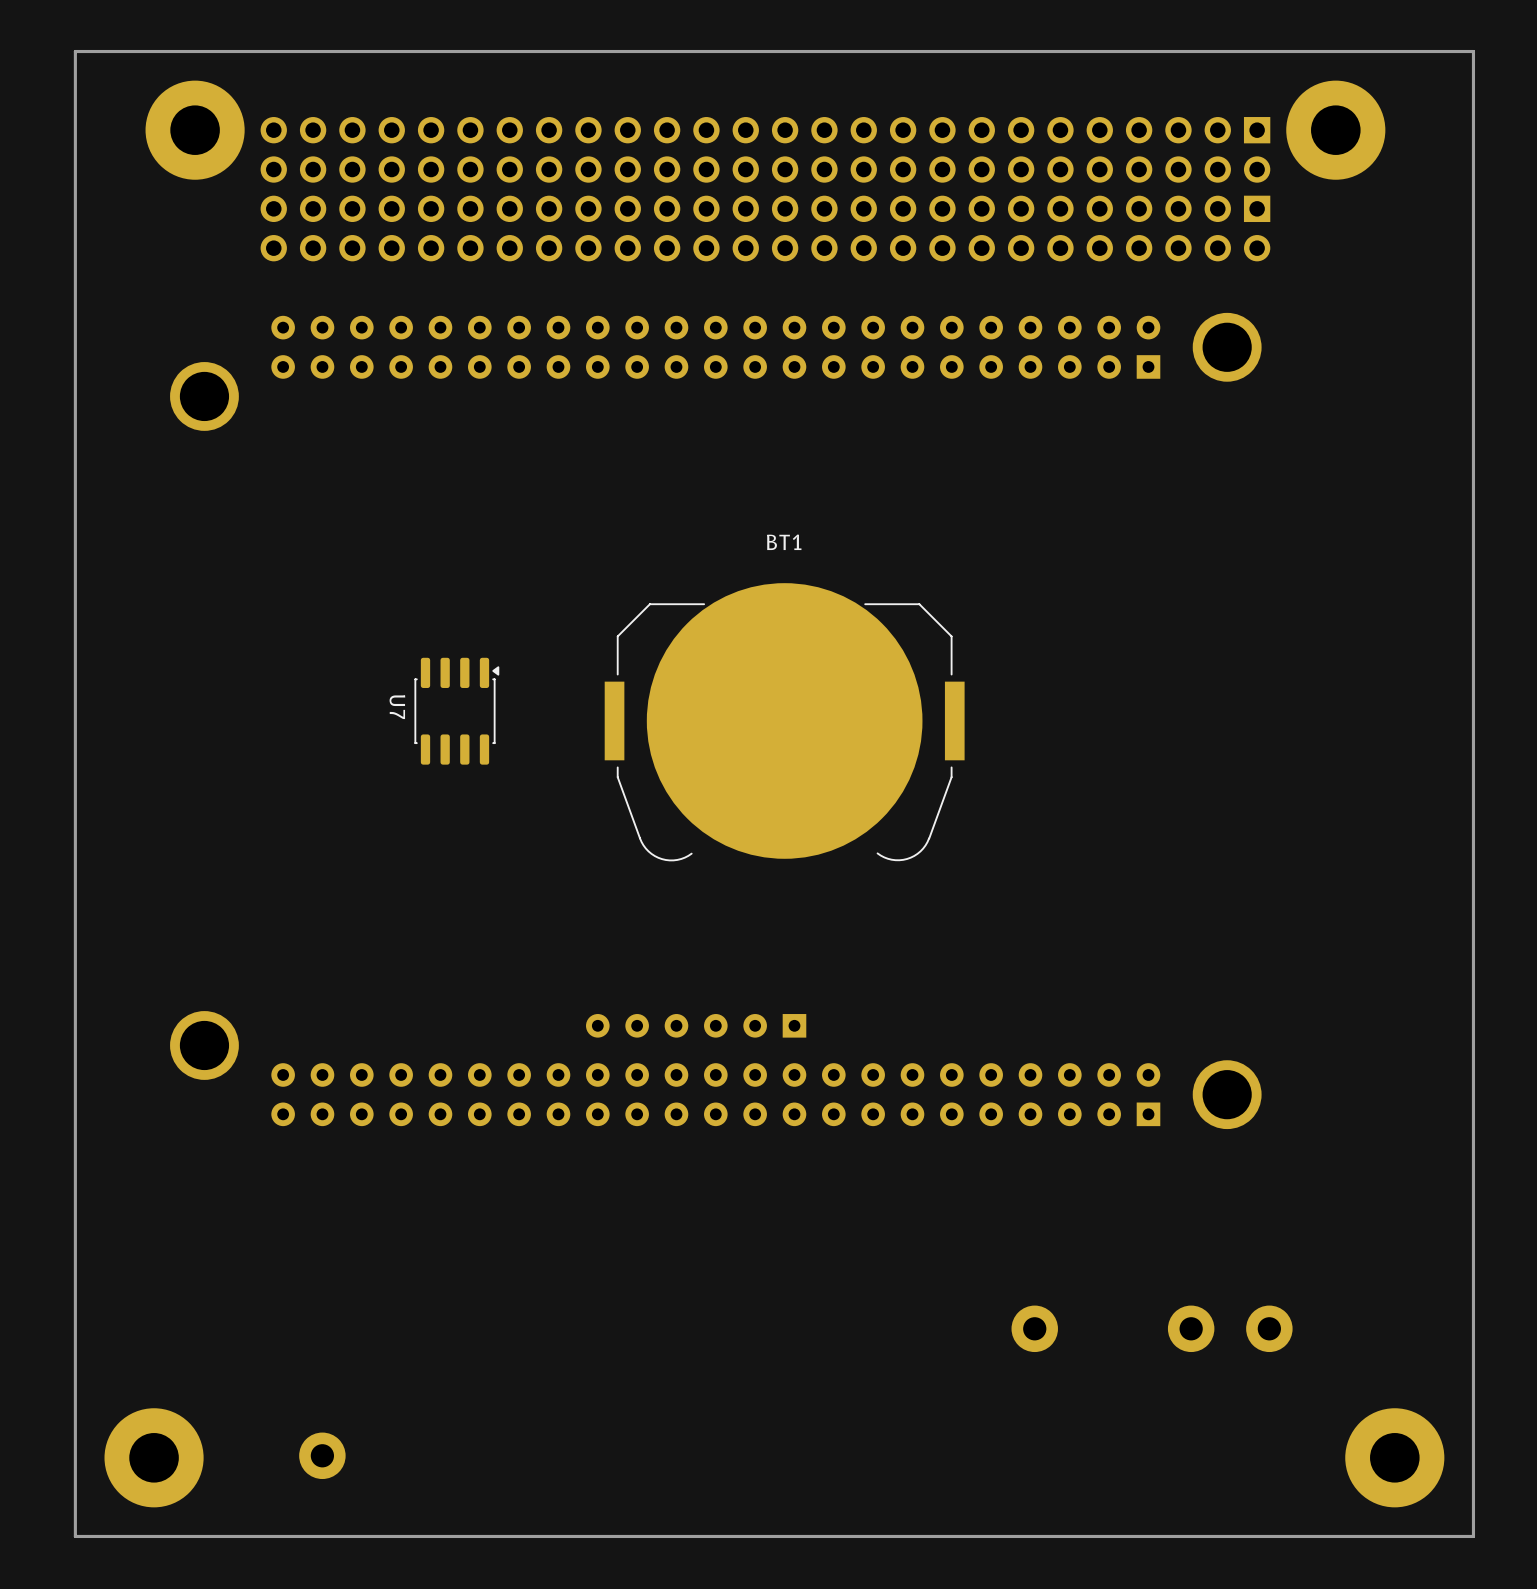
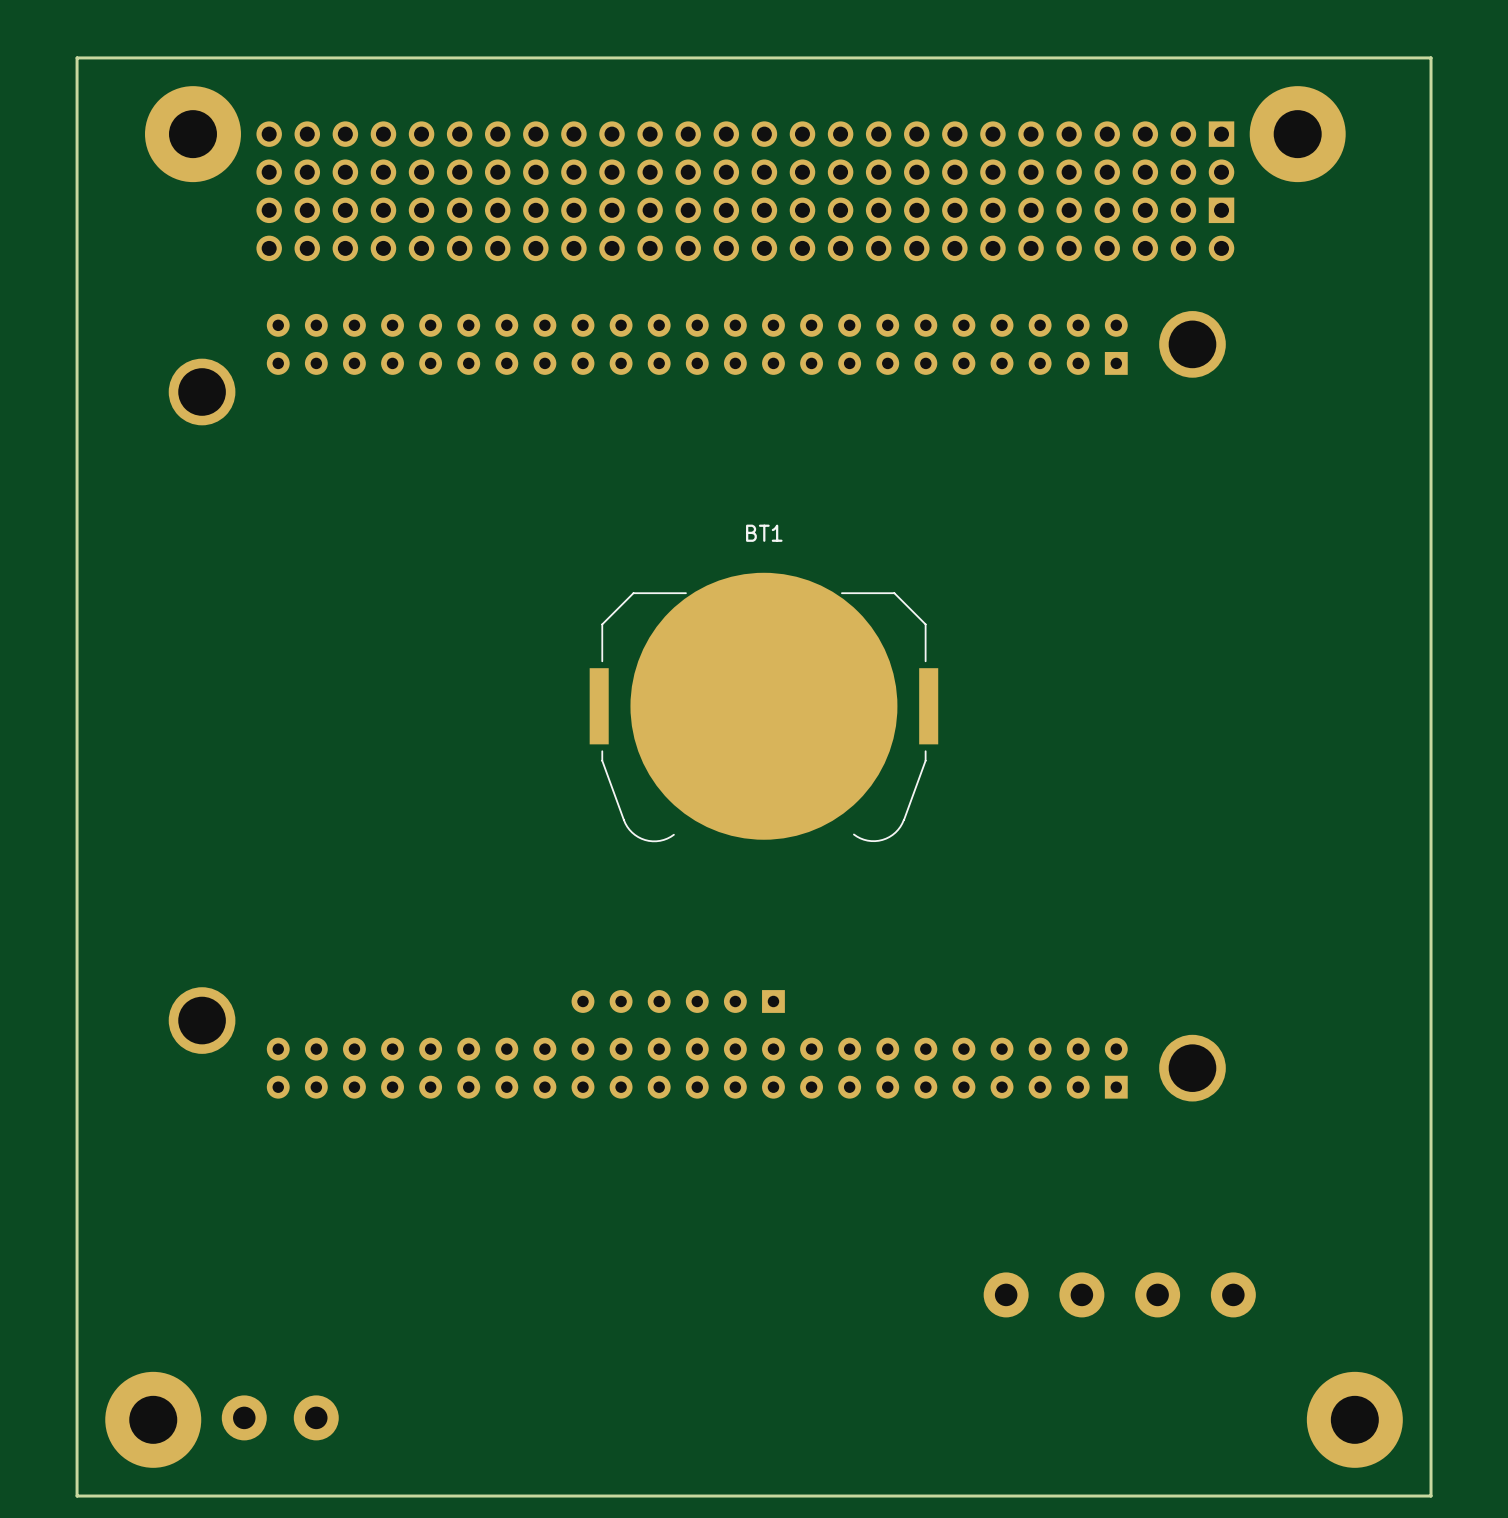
U7: (456, 711) -> none
part: none -> (1081, 1294)
part: none -> (244, 1417)

